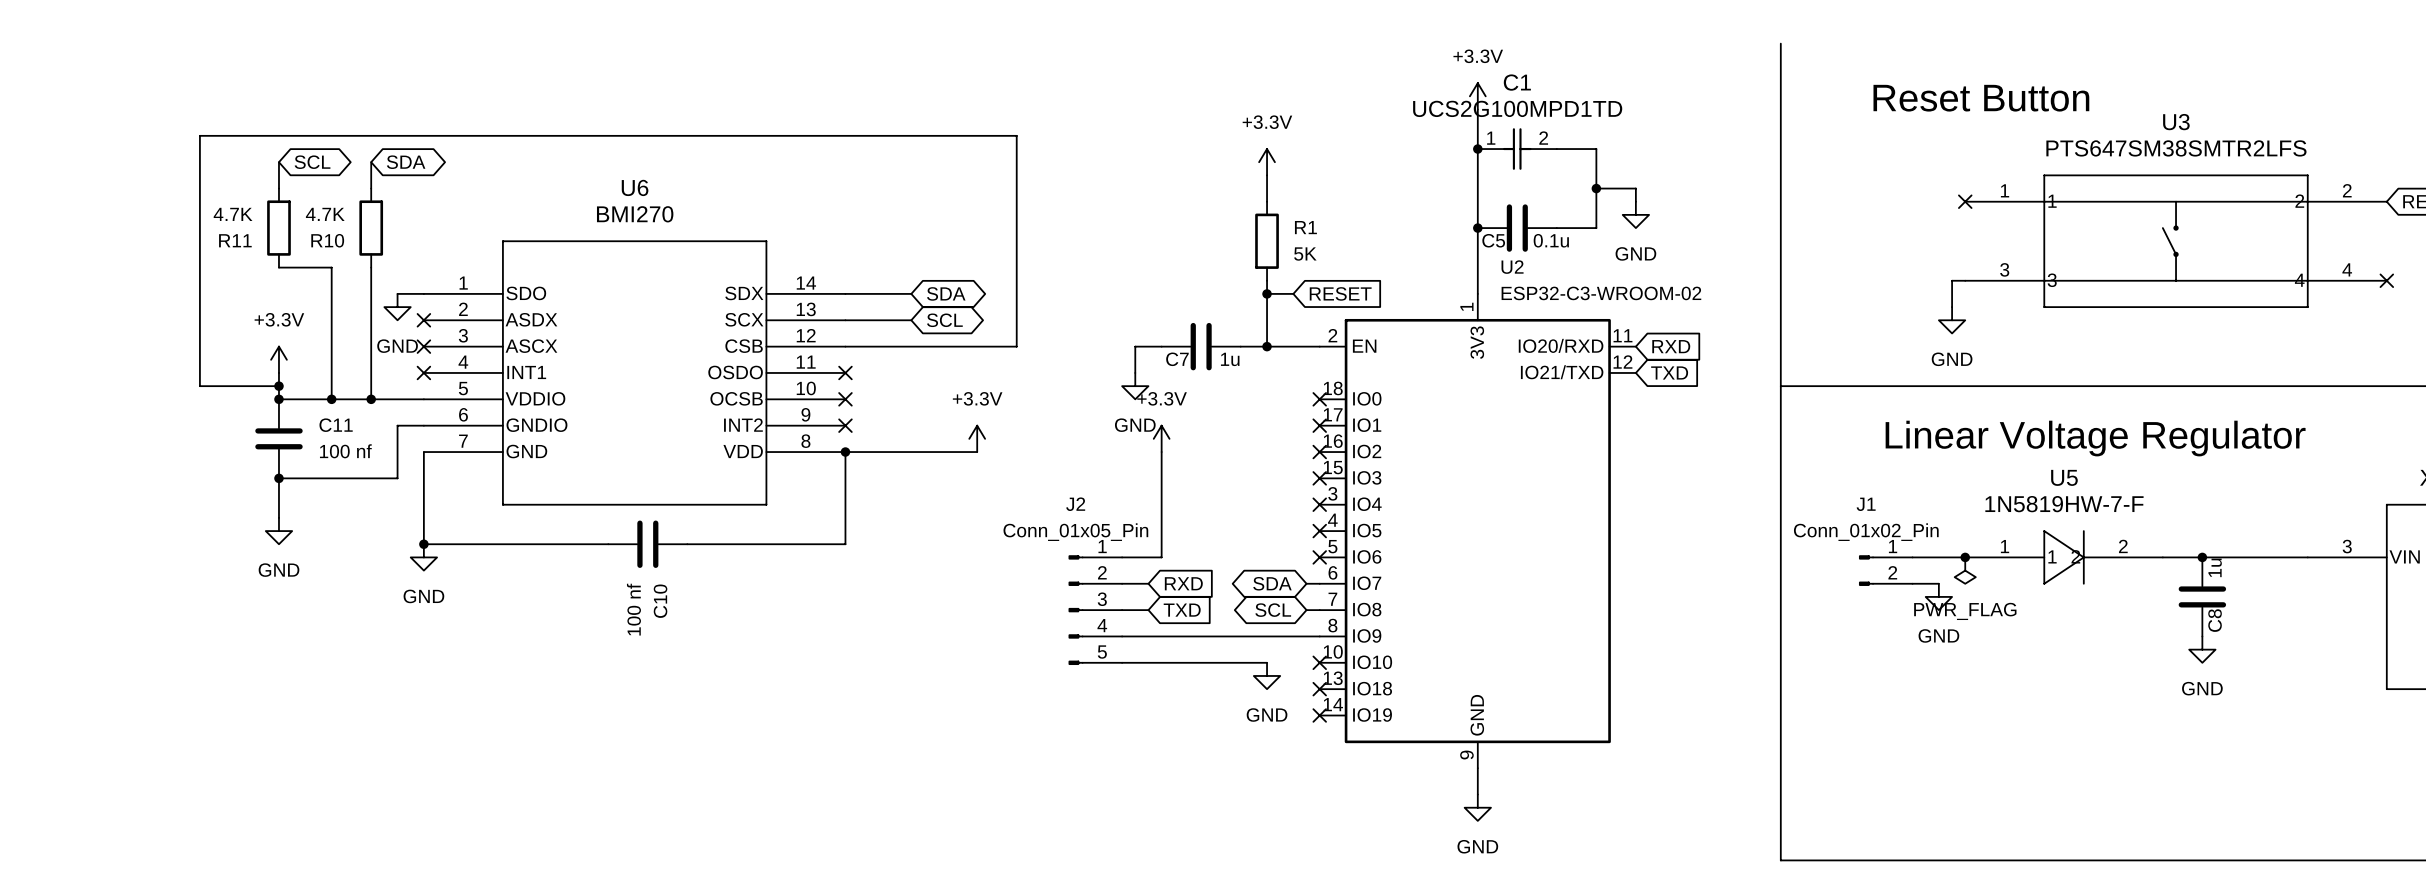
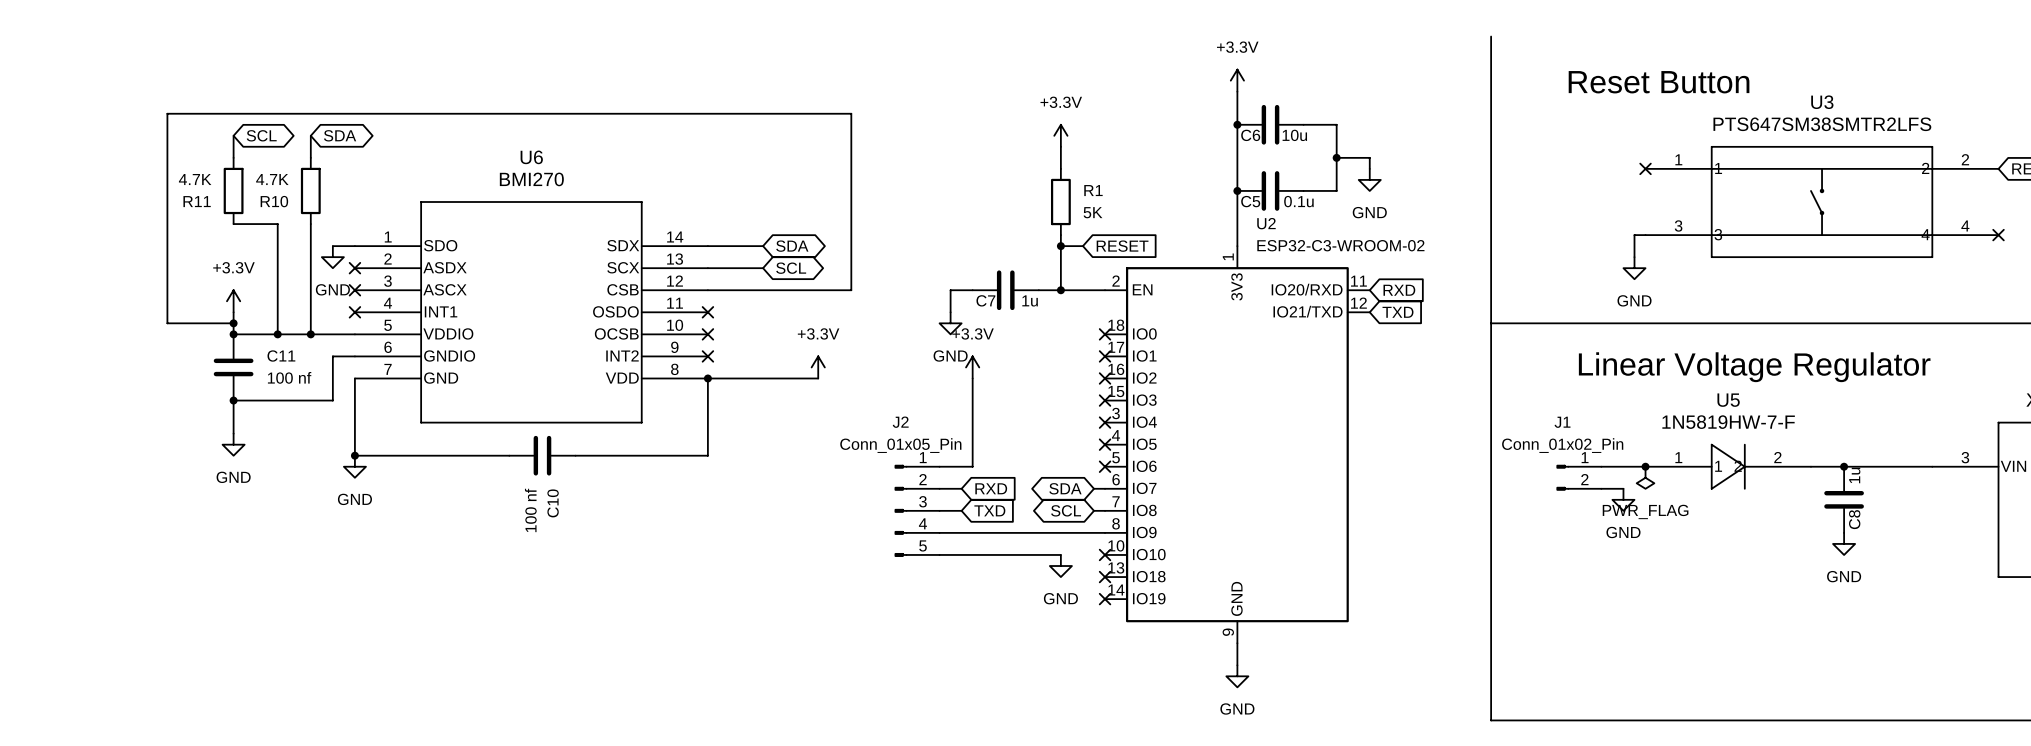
C1: UCS2G100MPD1TD (1517, 149) -> none
C6: none -> 10u (1270, 124)

